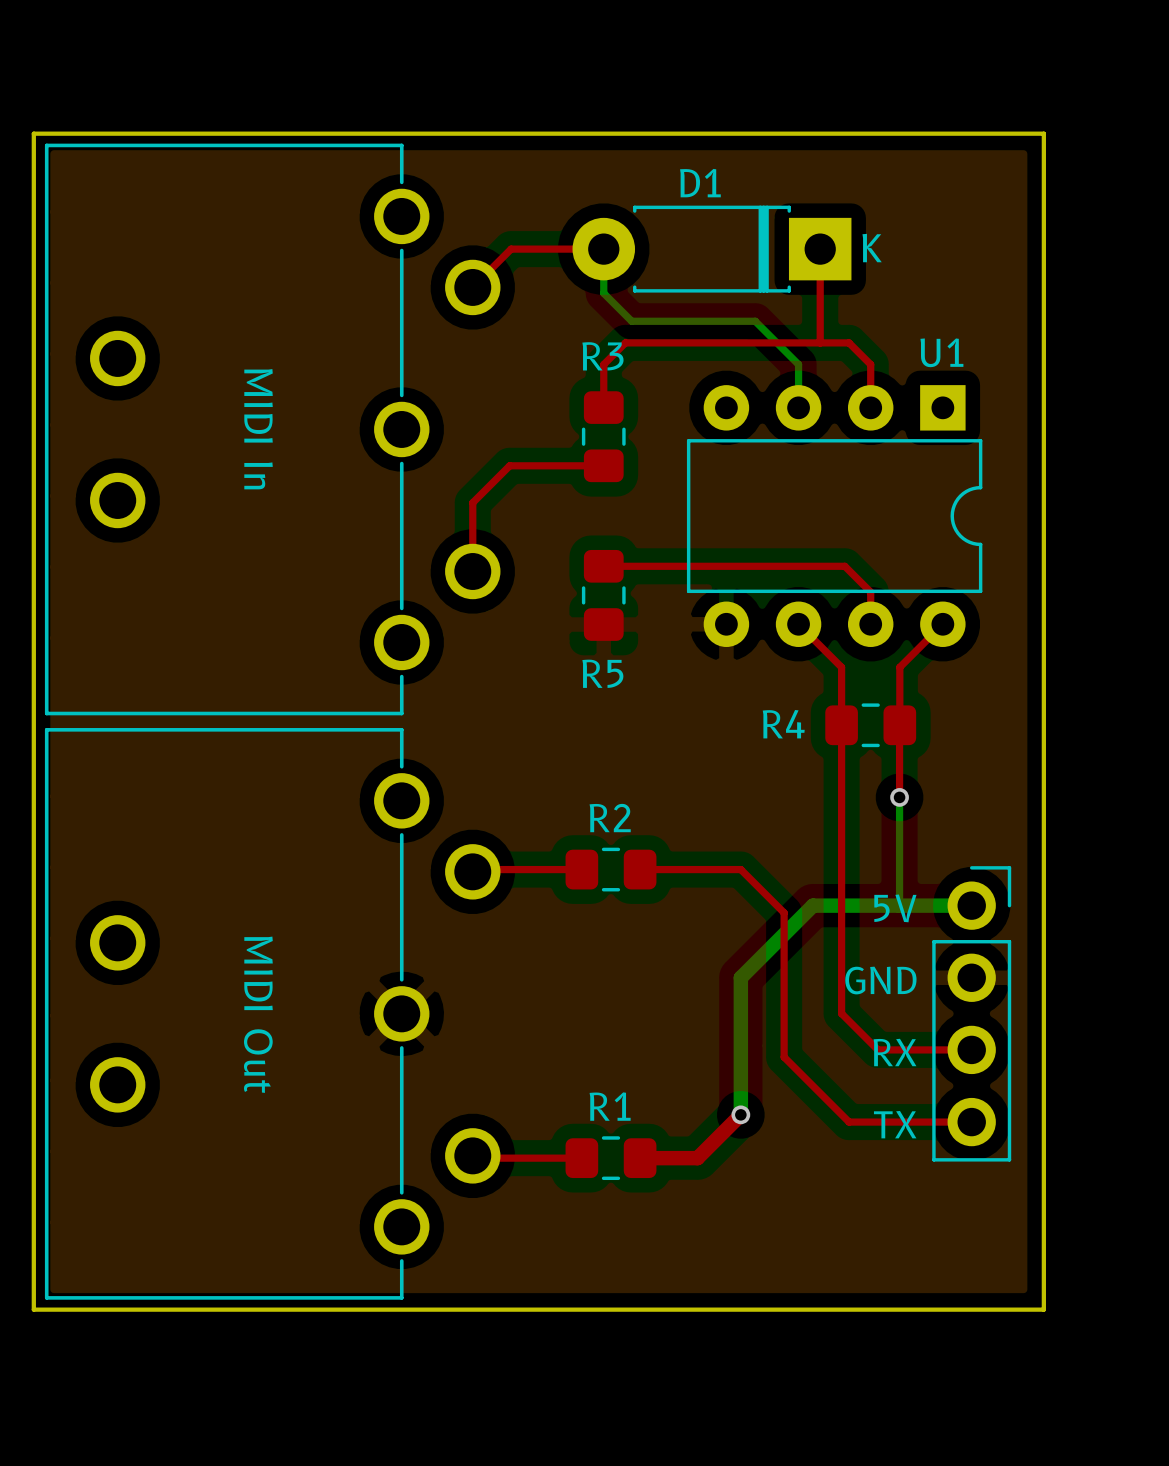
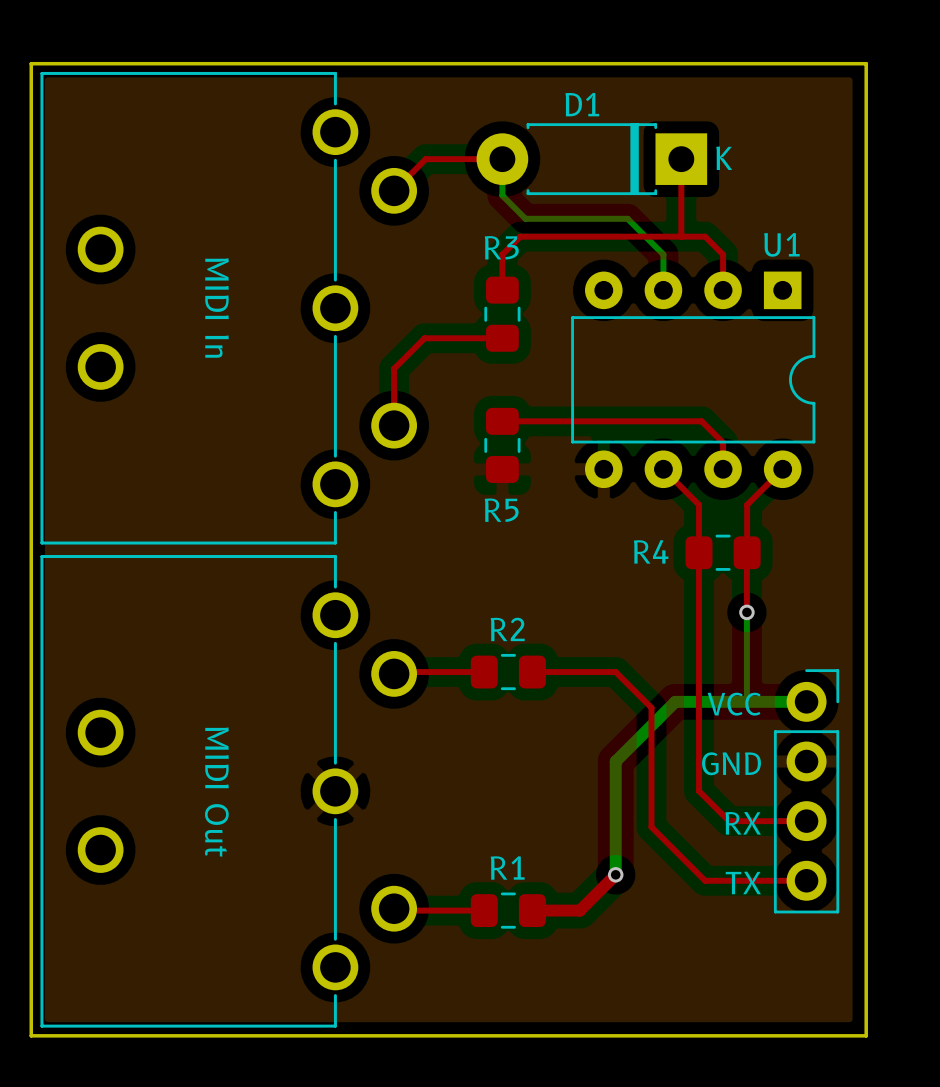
text: 5V (895, 908) -> VCC (734, 704)

